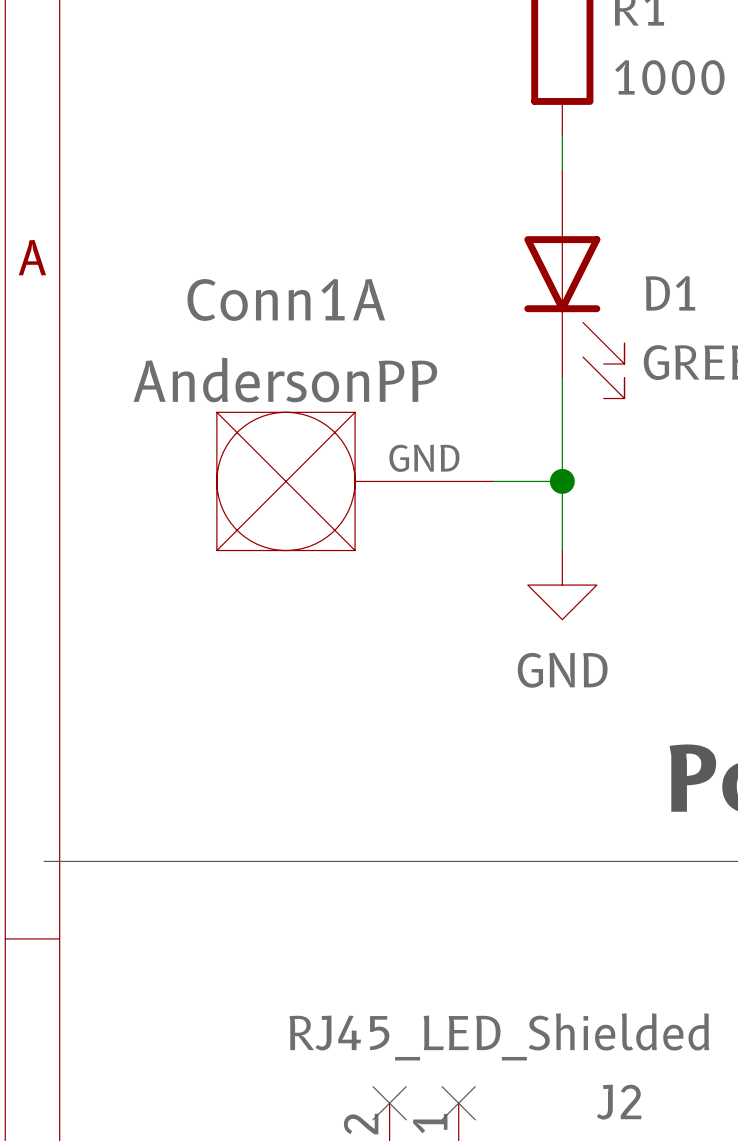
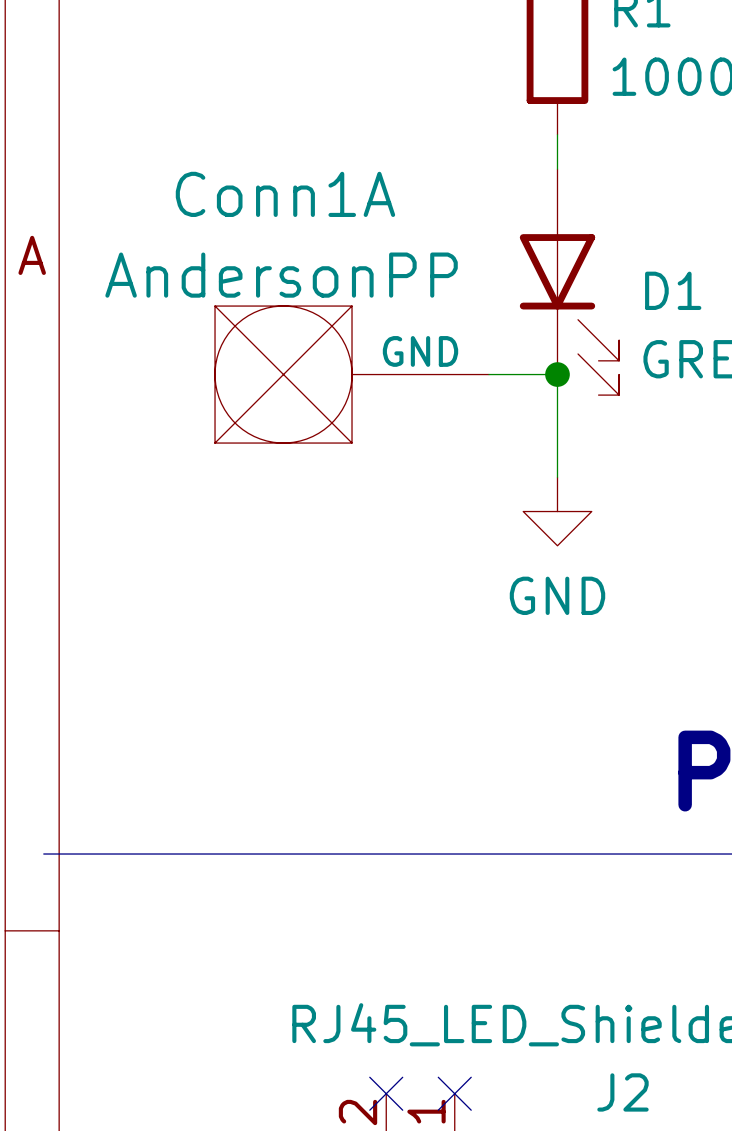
wire: none -> (488, 374) (557, 374)
Conn1A position: (355, 481) -> (352, 374)
wire: (493, 481) (562, 481) (562, 550) -> none
junction position: (562, 481) -> (557, 374)
power symbol position: GND (562, 585) -> GND (557, 511)

